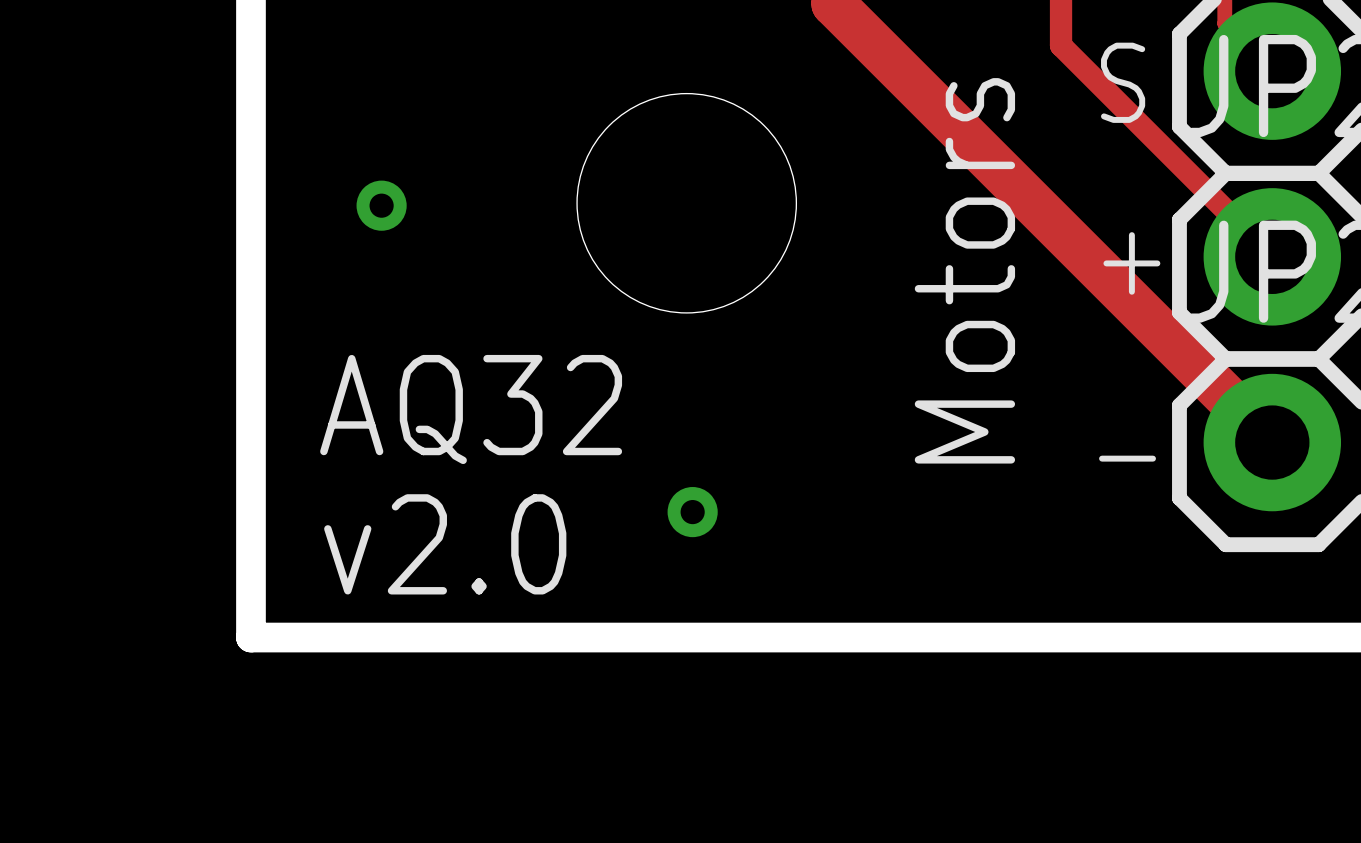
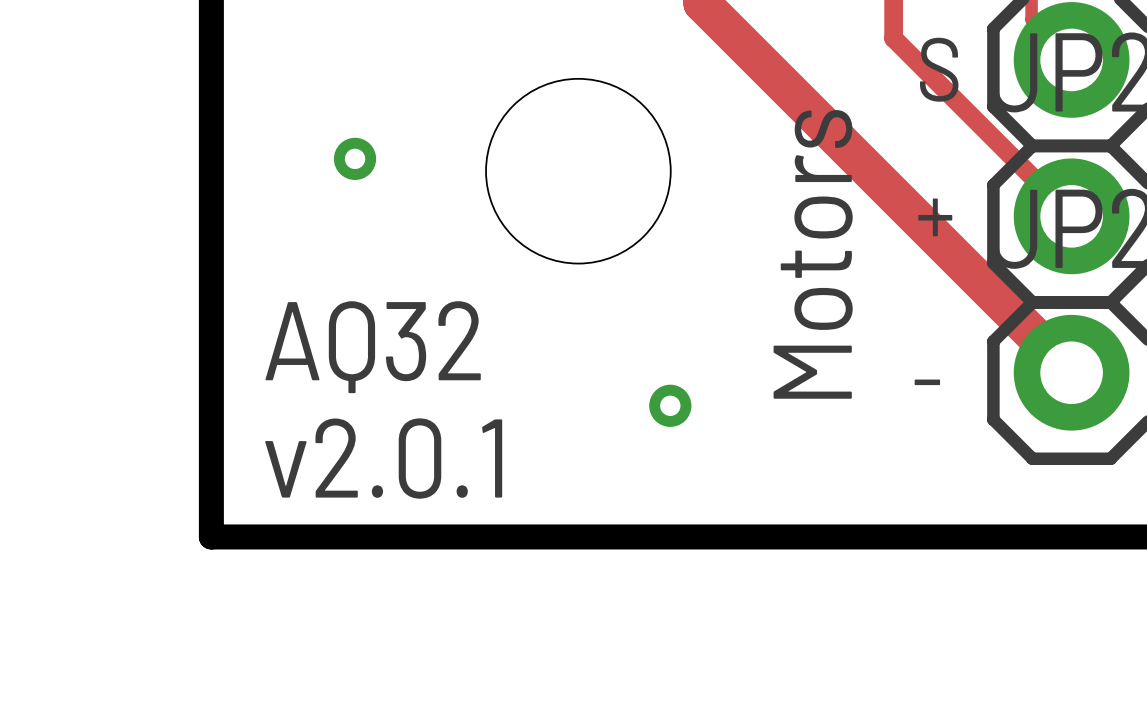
via position: (381, 205) -> (355, 158)
via position: (692, 512) -> (670, 405)
text: v2.0 (445, 544) -> v2.0.1 (383, 458)

